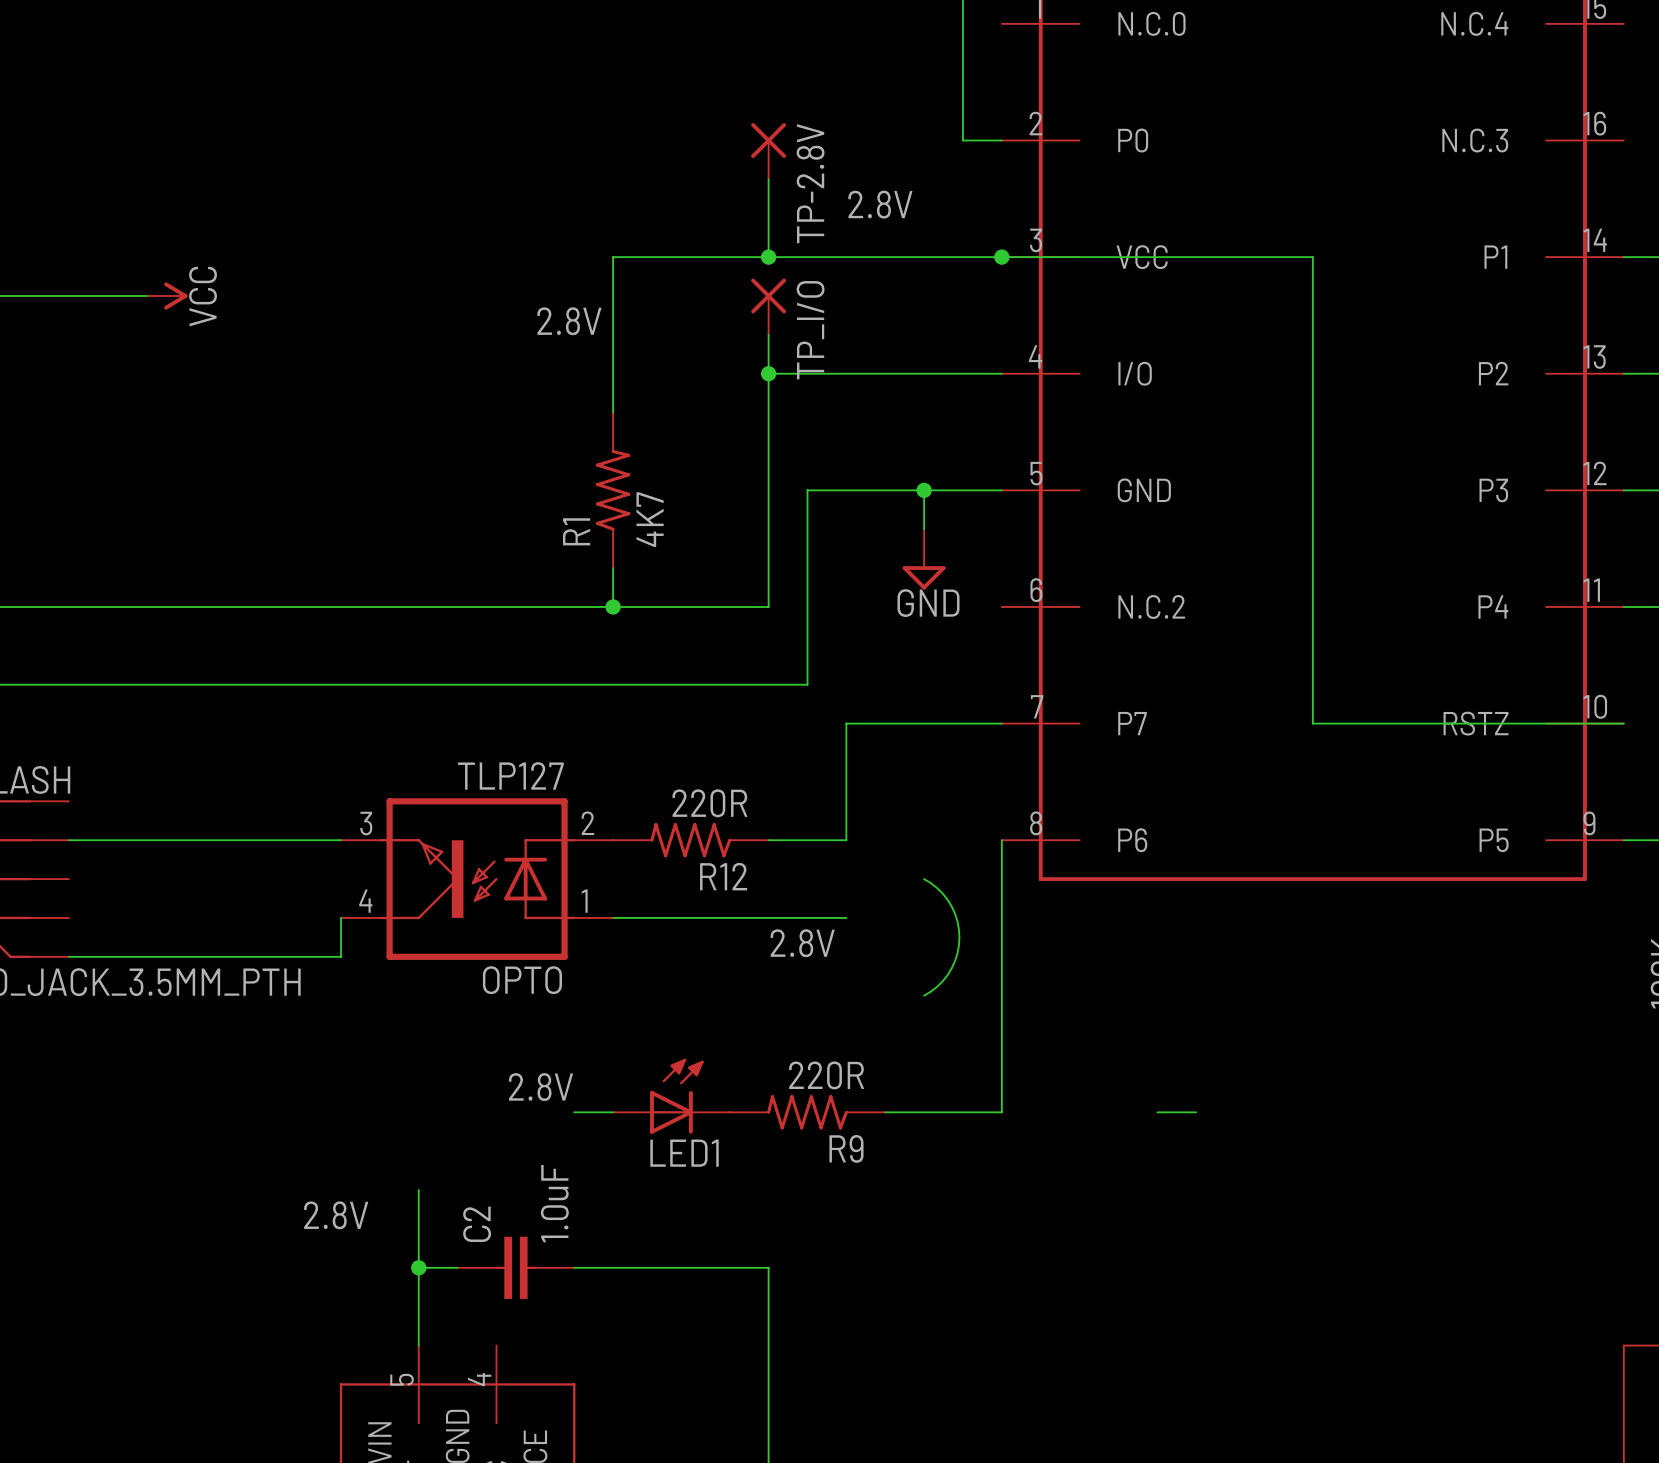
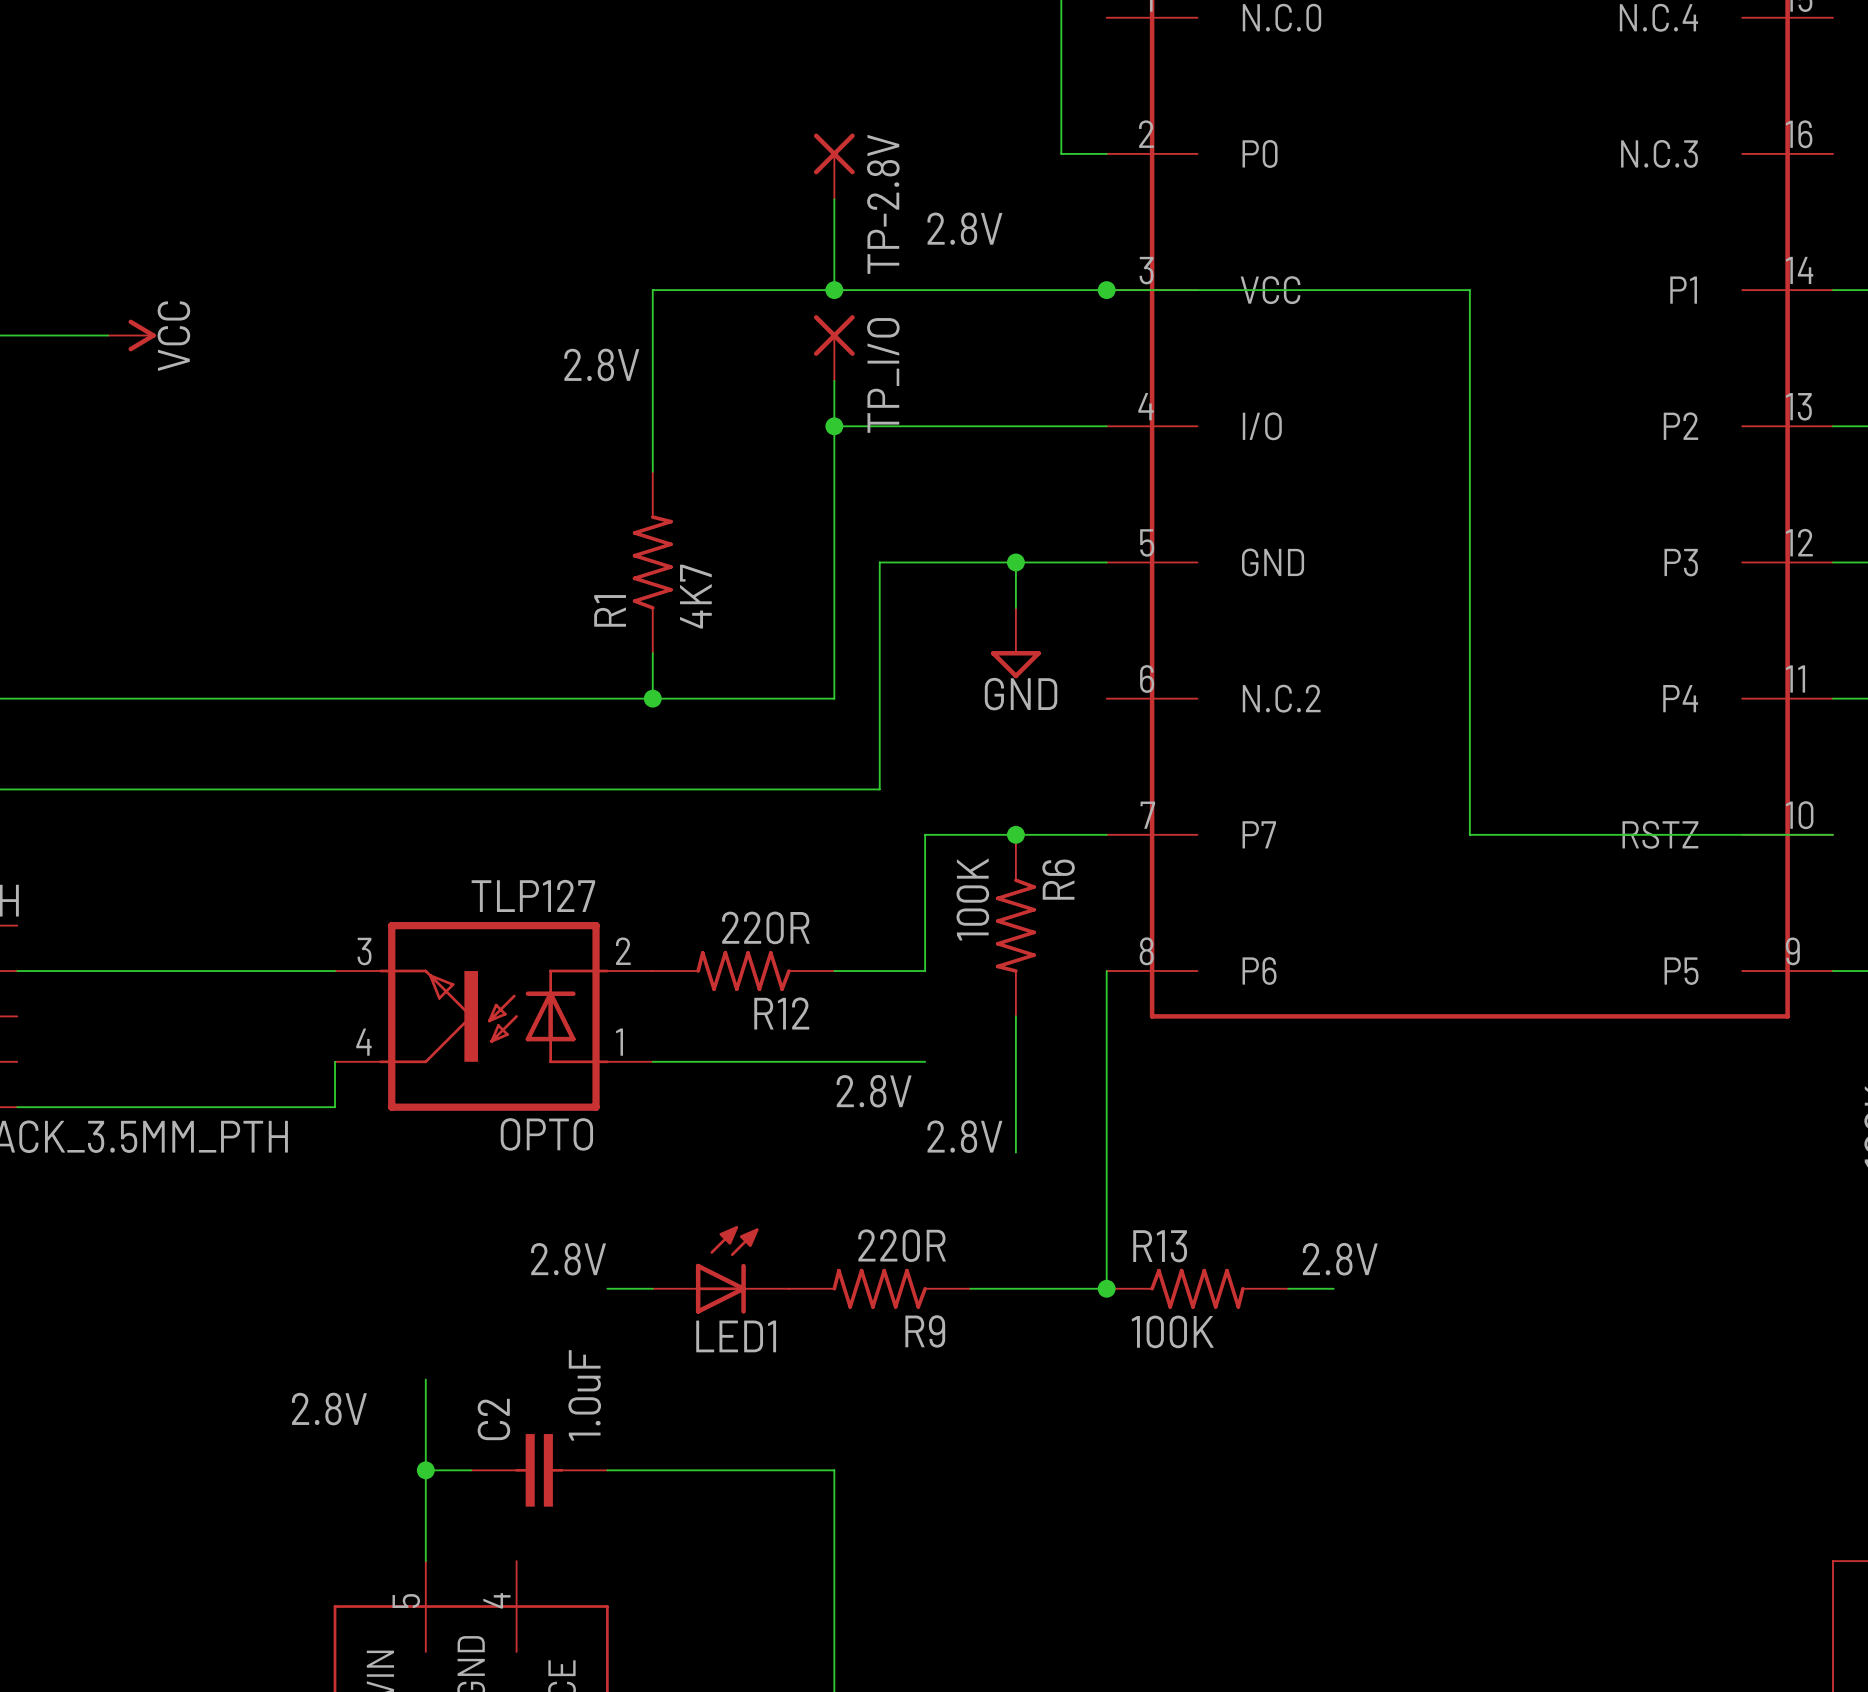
junction: none -> (1015, 834)
R6: none -> 100K (1015, 925)
wire: (924, 879) (942, 893) (951, 906) (957, 921) (959, 937) (955, 960) (947, 974) (937, 986) (924, 995) -> (1015, 1016) (1015, 1152)
label: none -> 2.8V (964, 1136)
label: none -> 2.8V (1340, 1259)
junction: none -> (1106, 1288)
R13: none -> 100K (1197, 1288)

